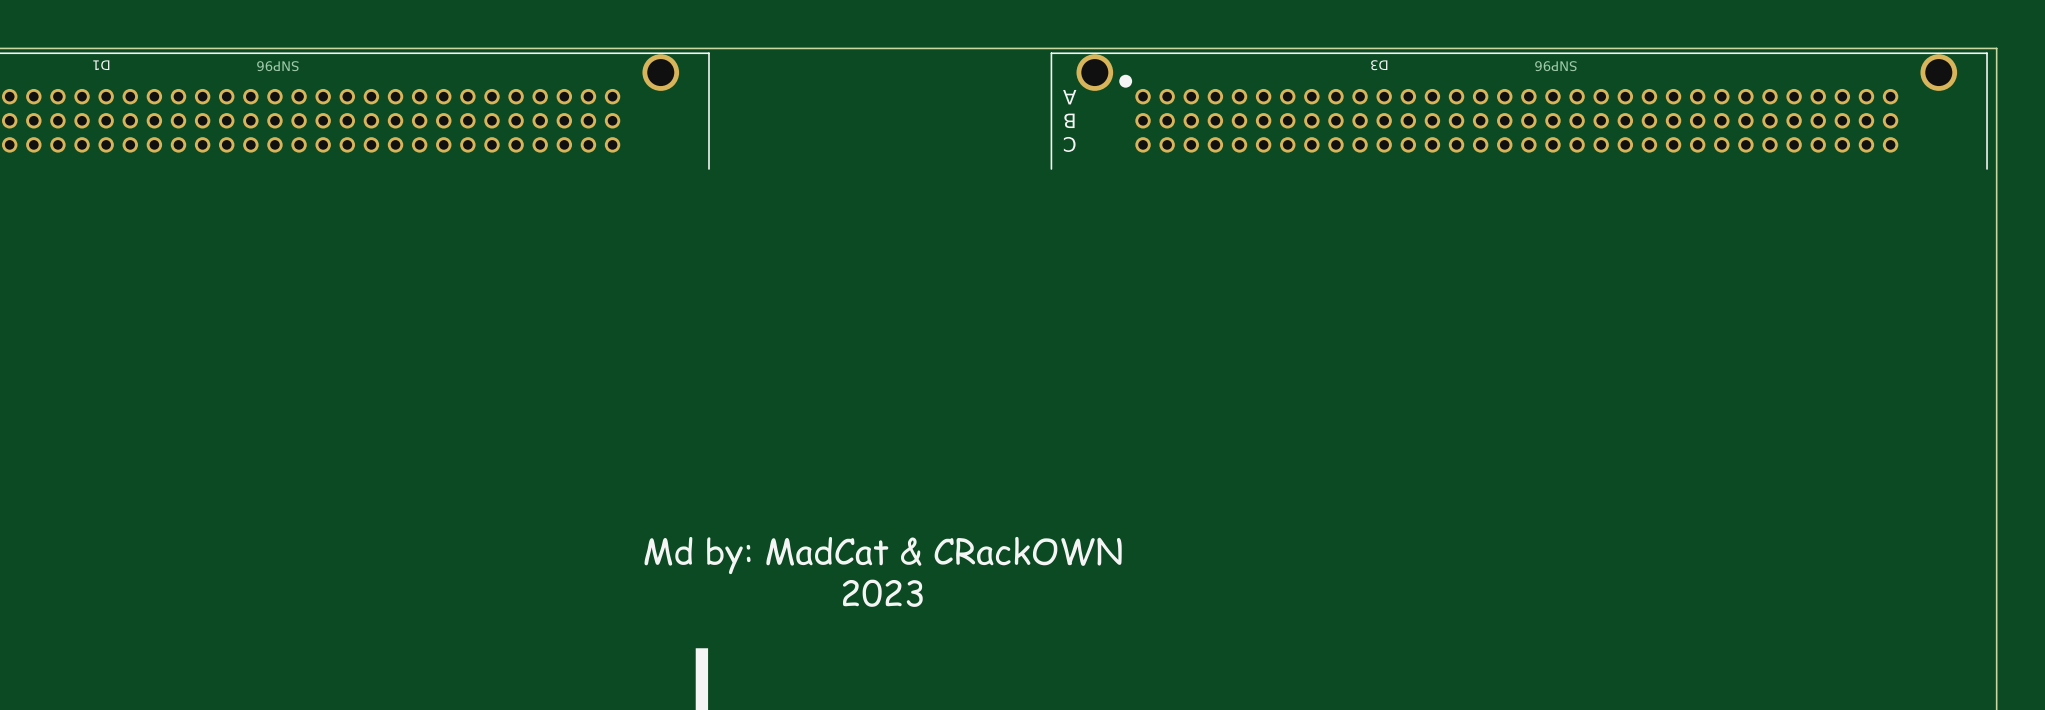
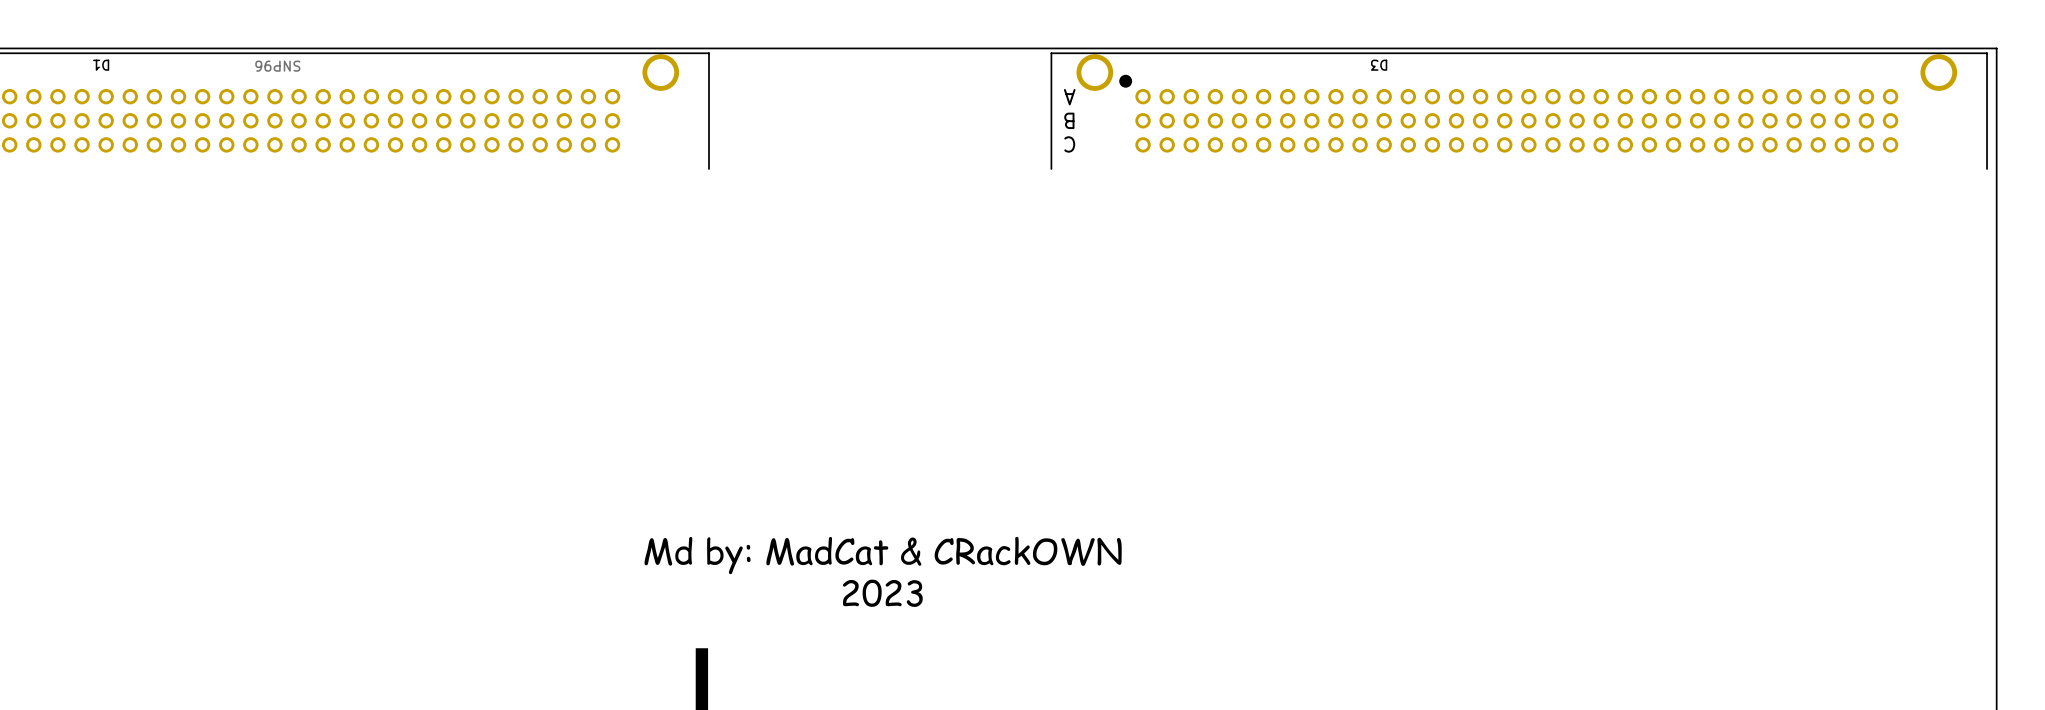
D3 value: SNP96 (1555, 66) -> none

